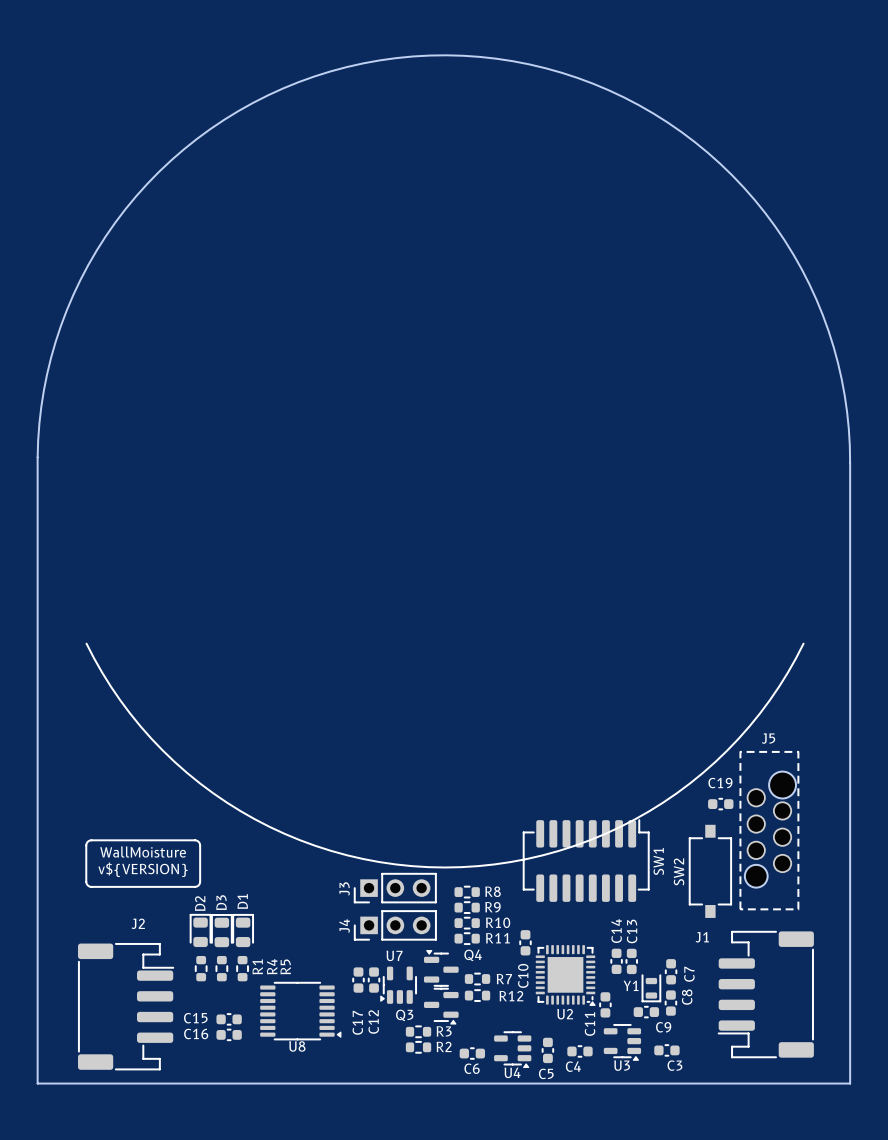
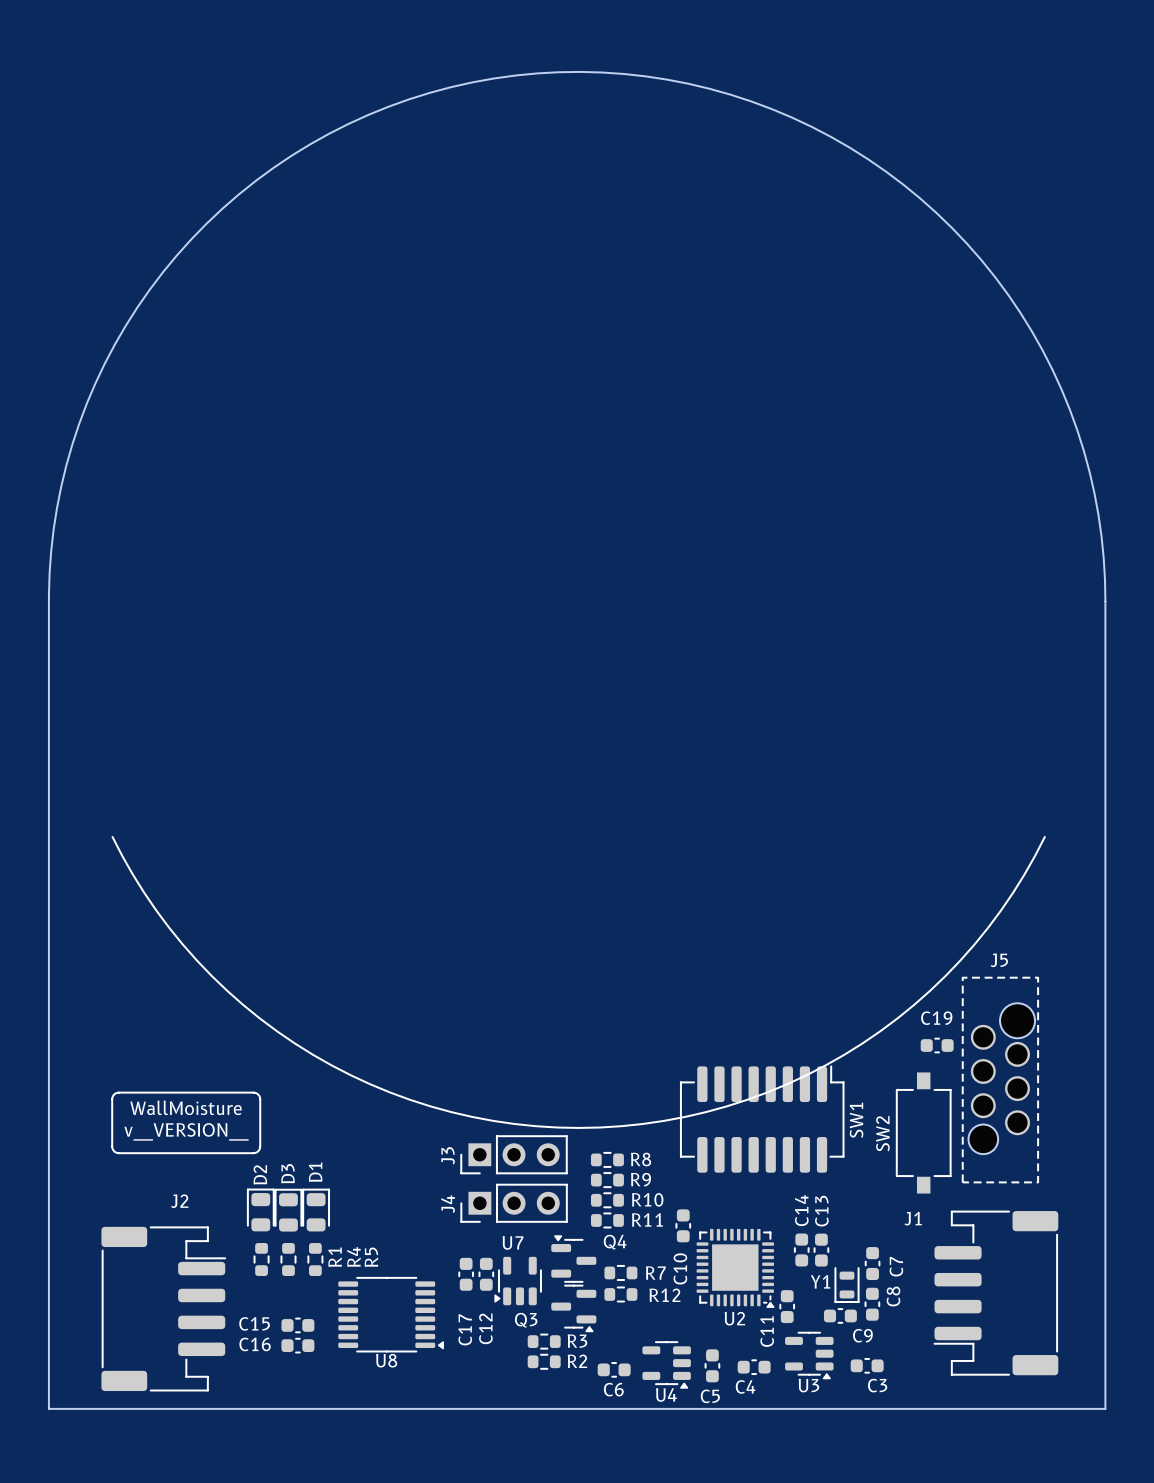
text: v${VERSION} (143, 869) -> v__VERSION__ (186, 1131)

